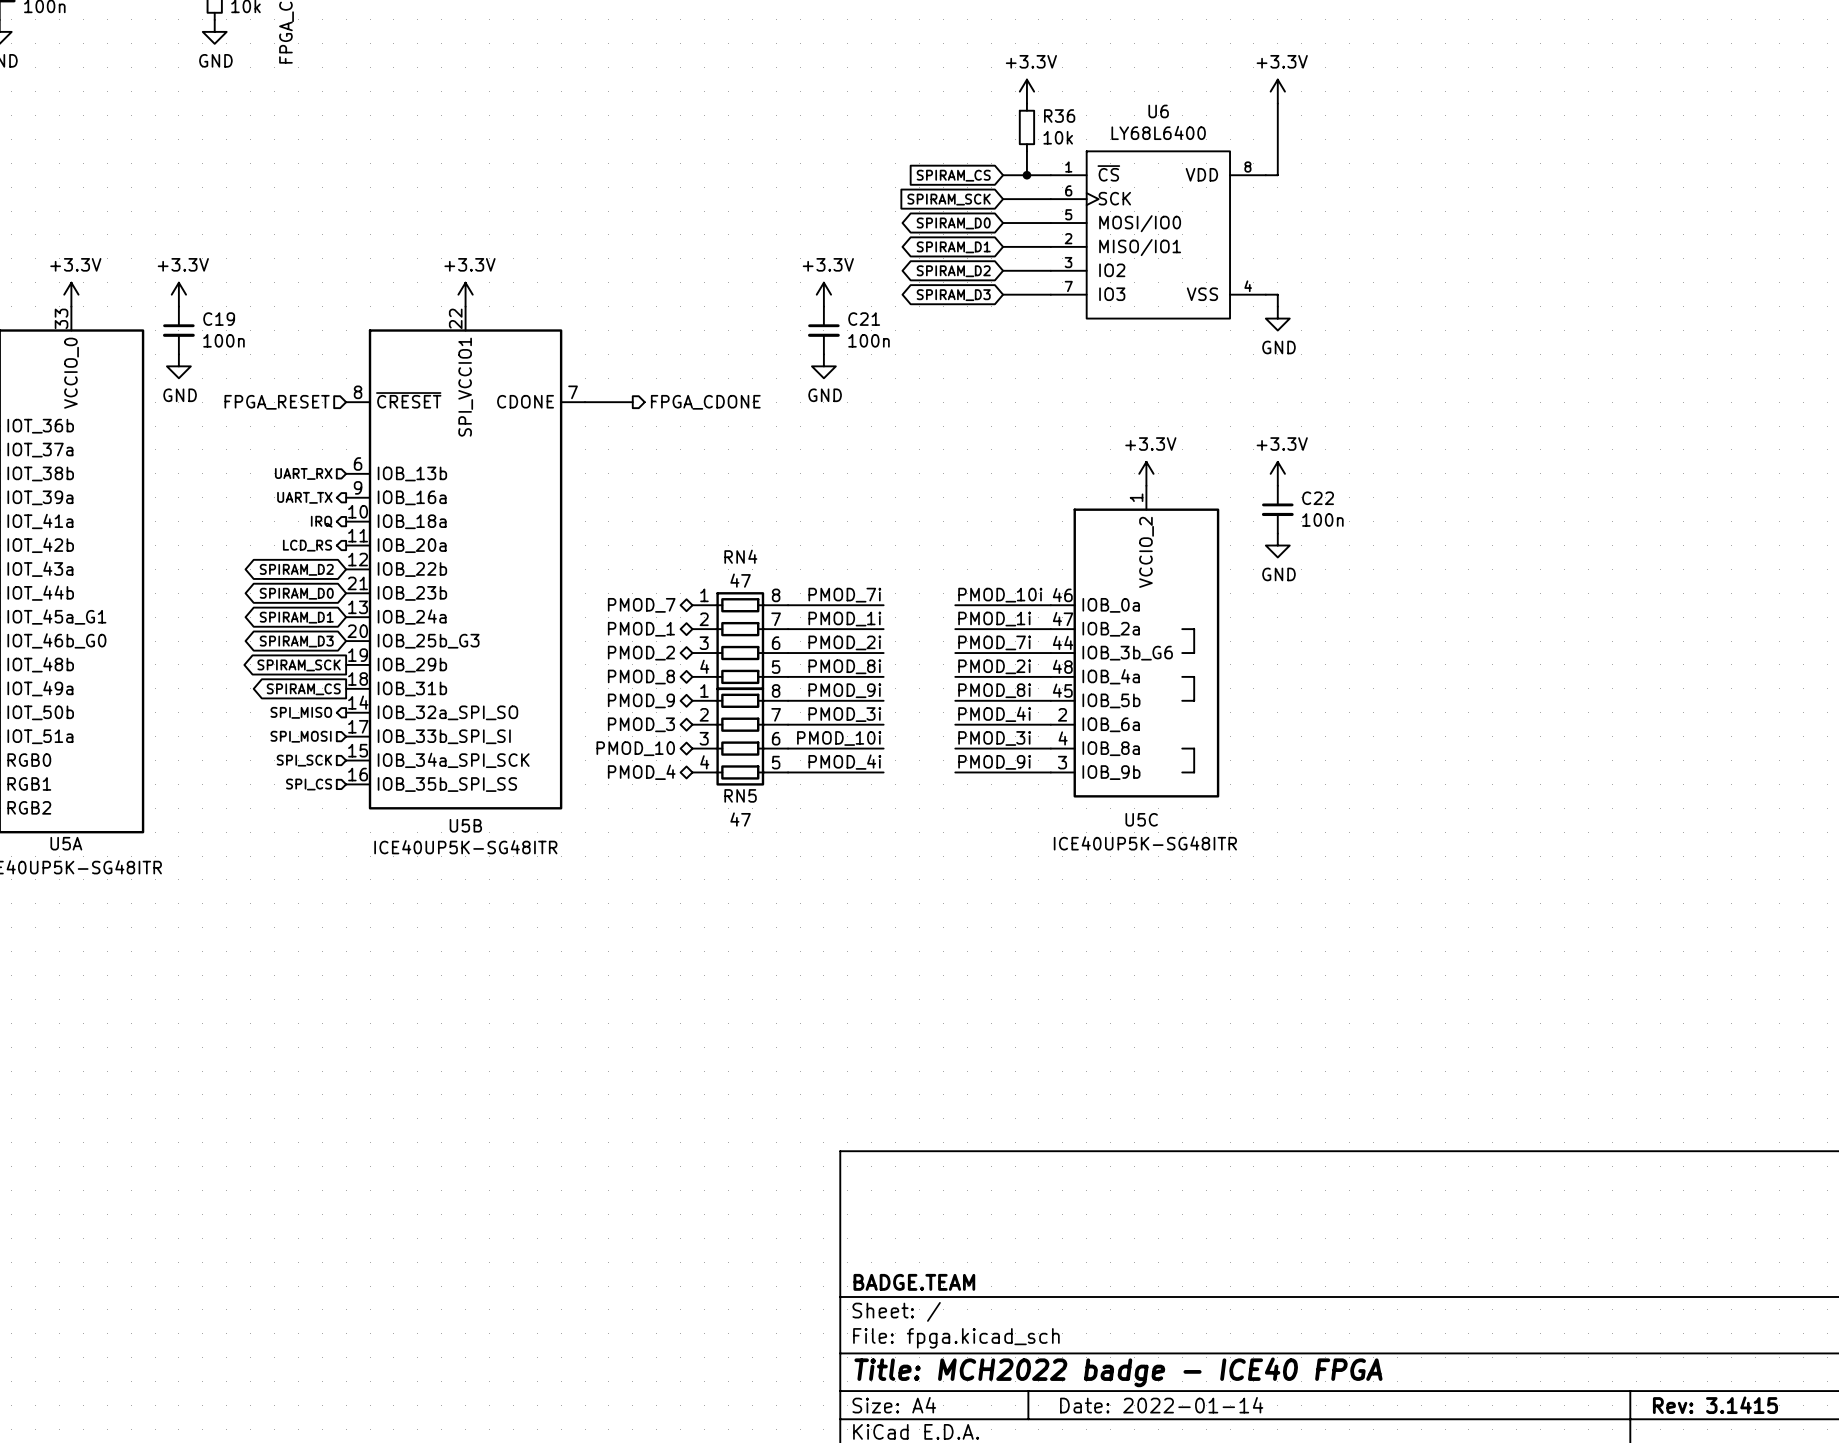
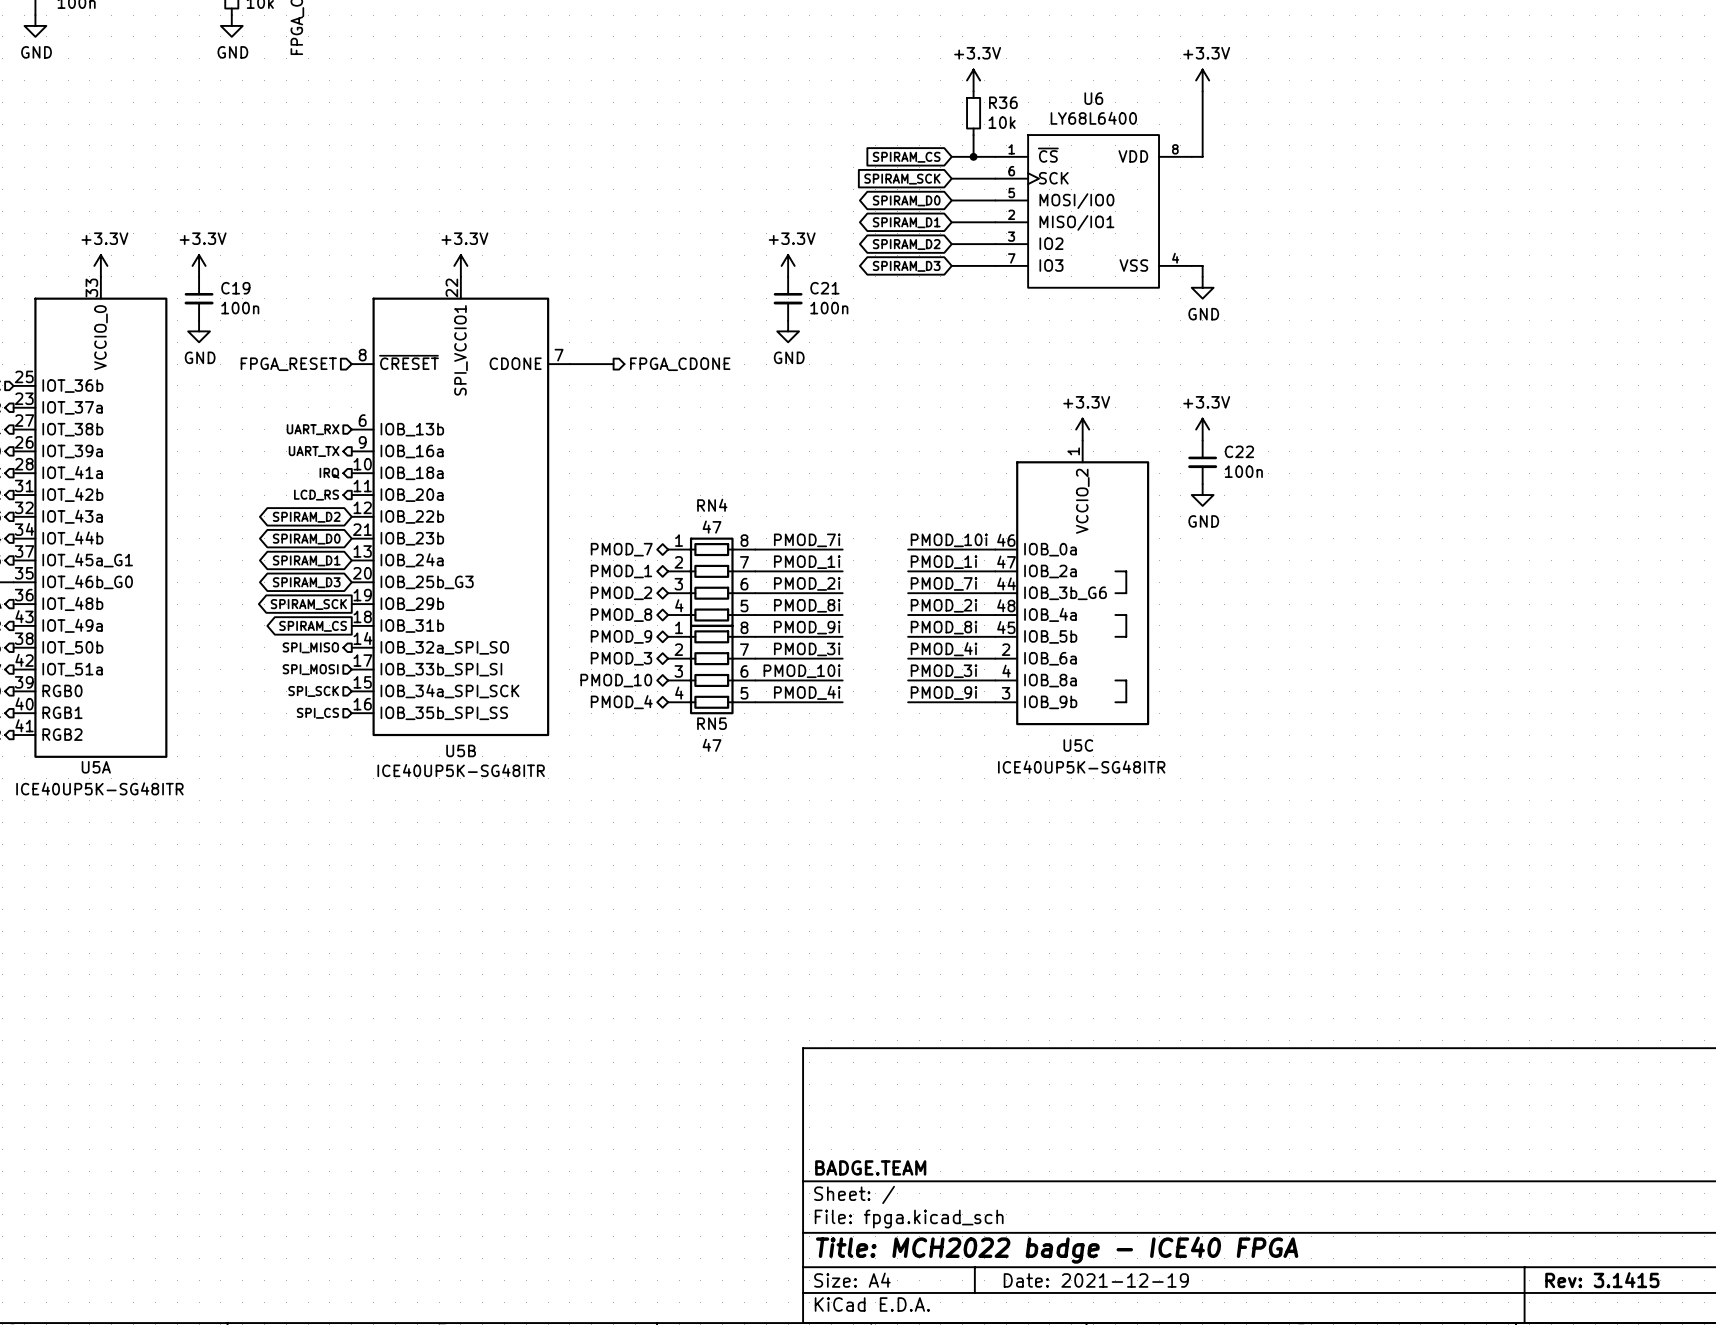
title block: Date: 2022-01-14 (1161, 1405) -> Date: 2021-12-19 (1096, 1280)

